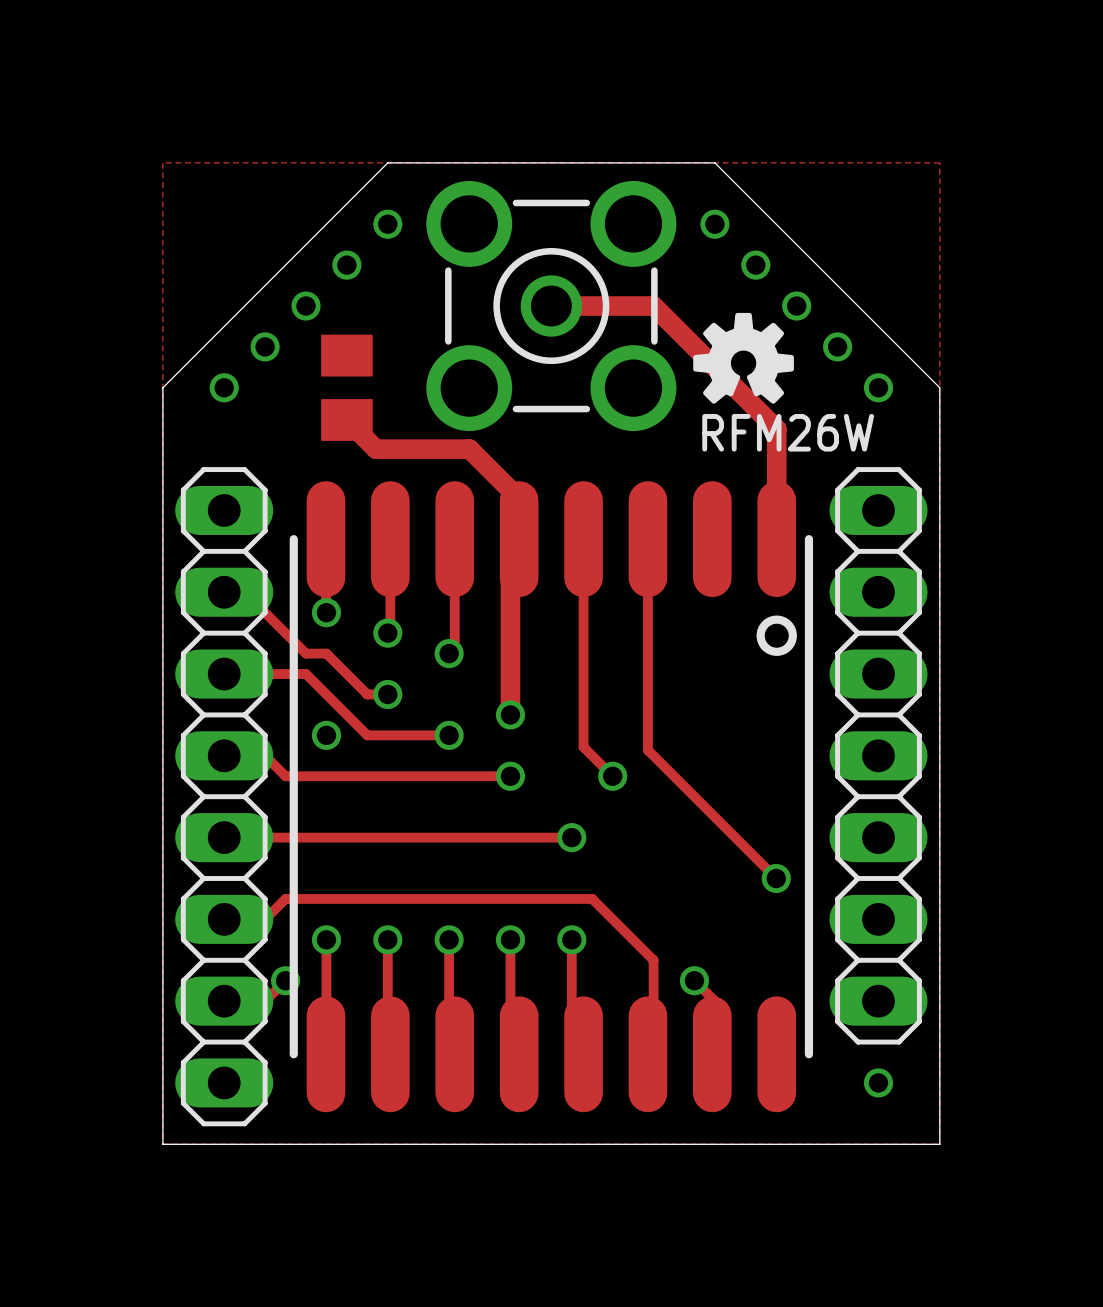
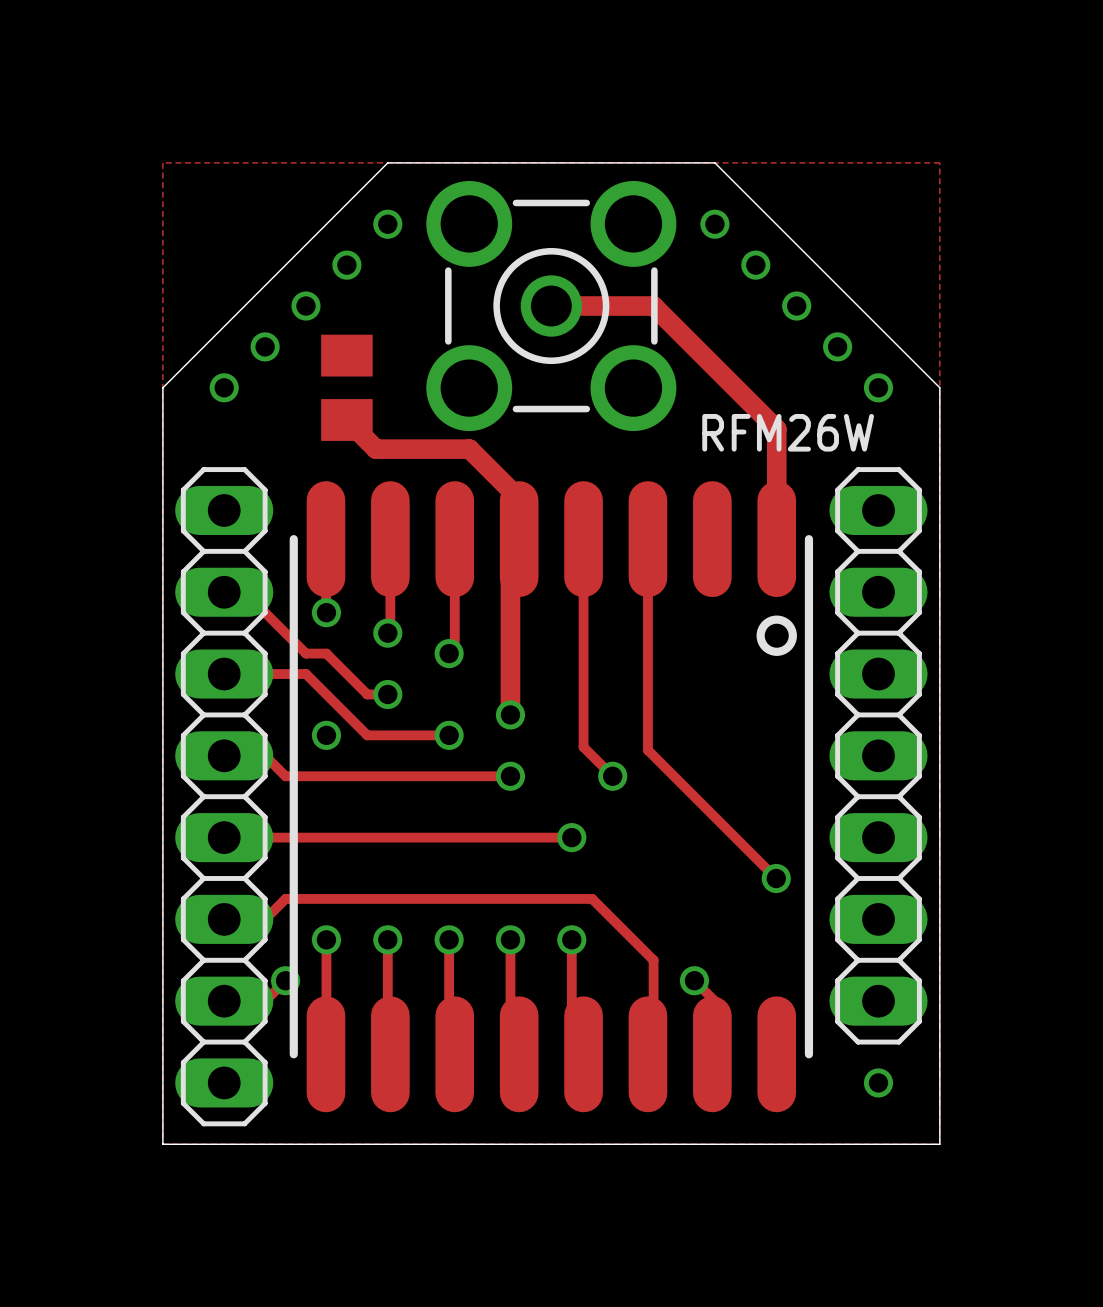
drawing: [693, 312, 794, 404] -> none

